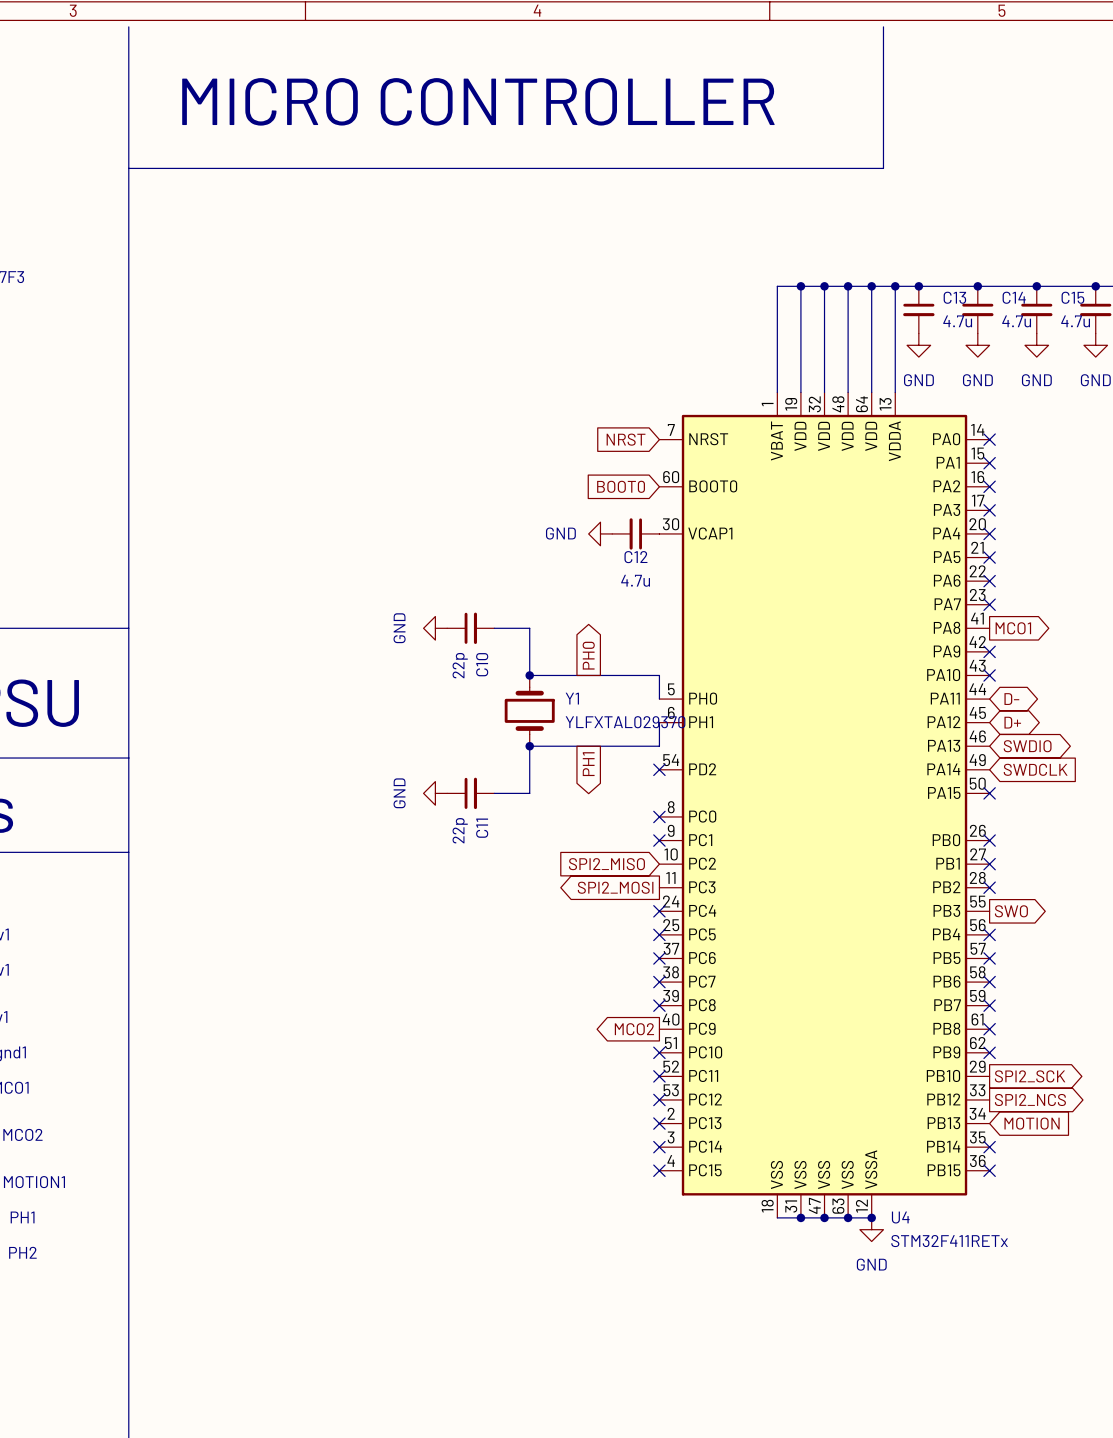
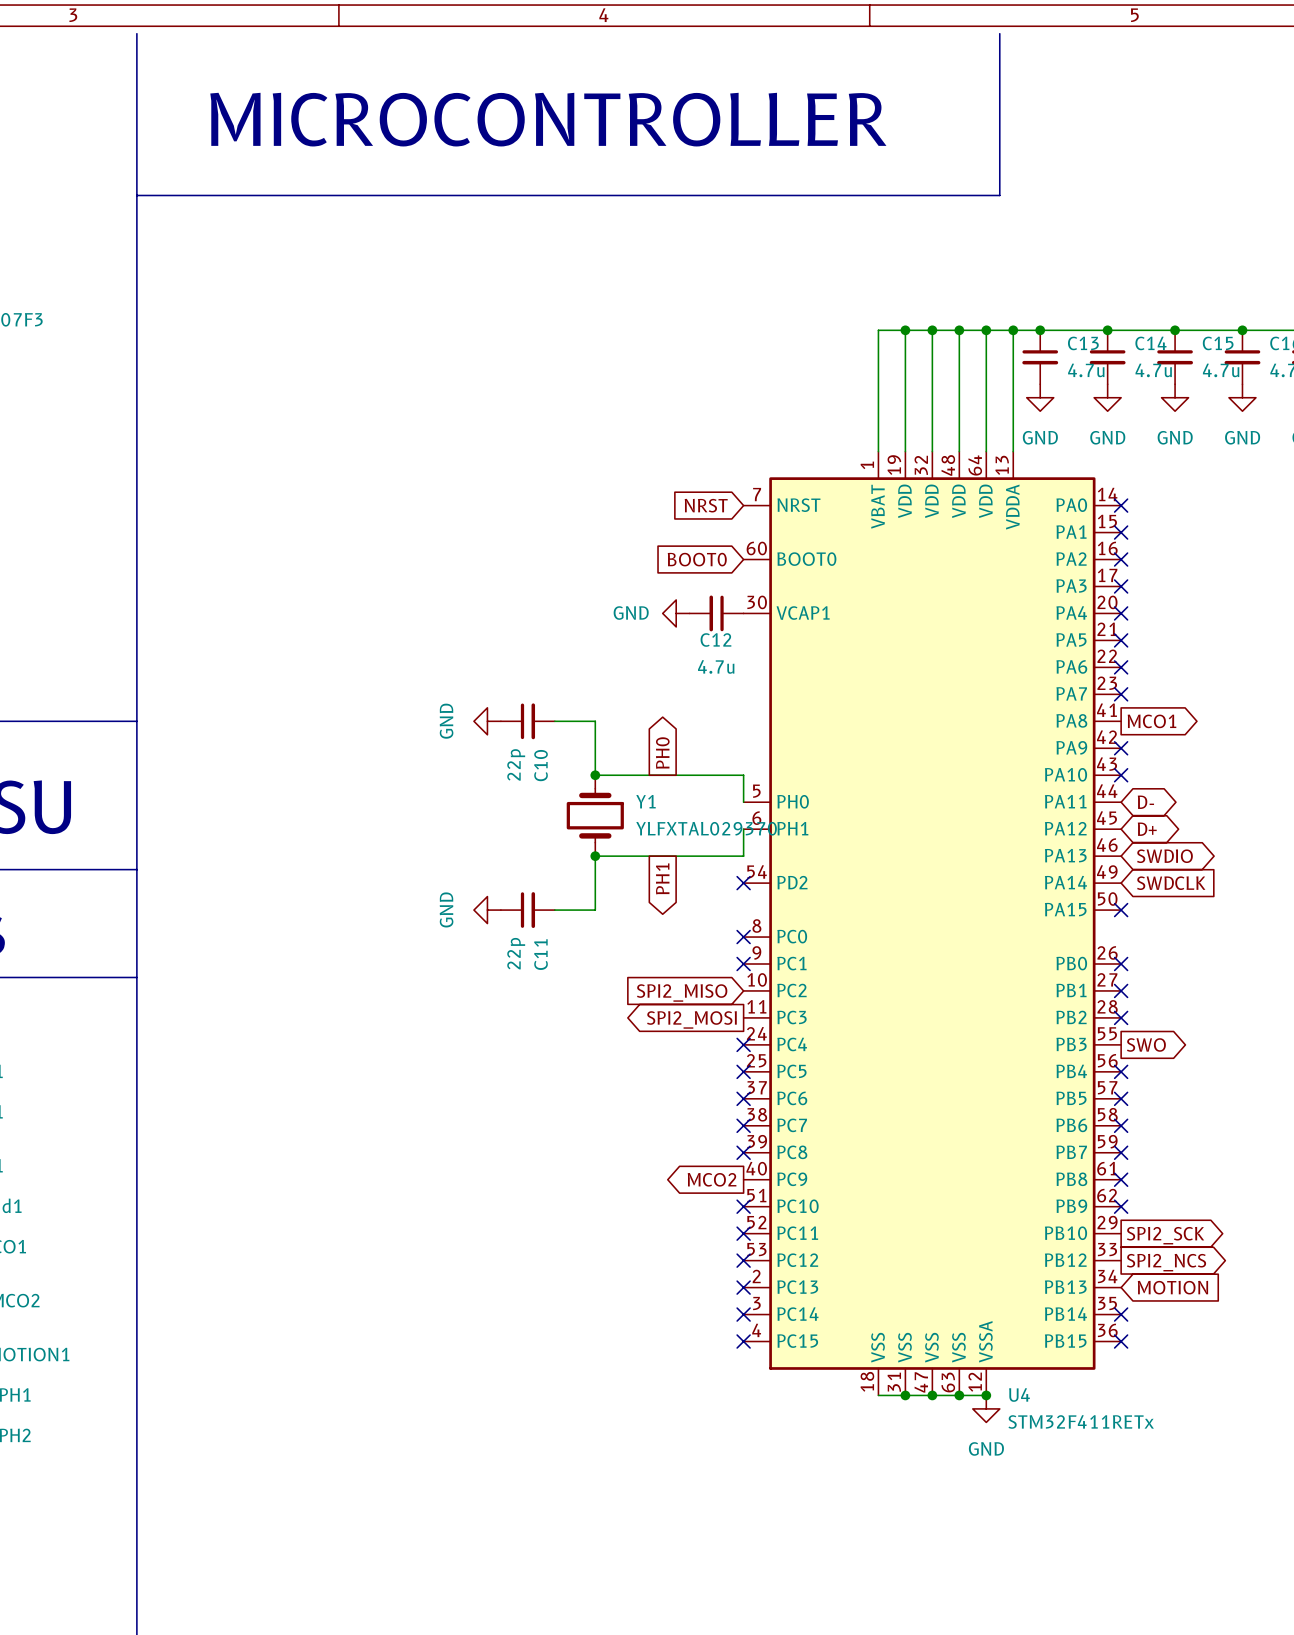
text: MICRO CONTROLLER (478, 101) -> MICROCONTROLLER (548, 119)

